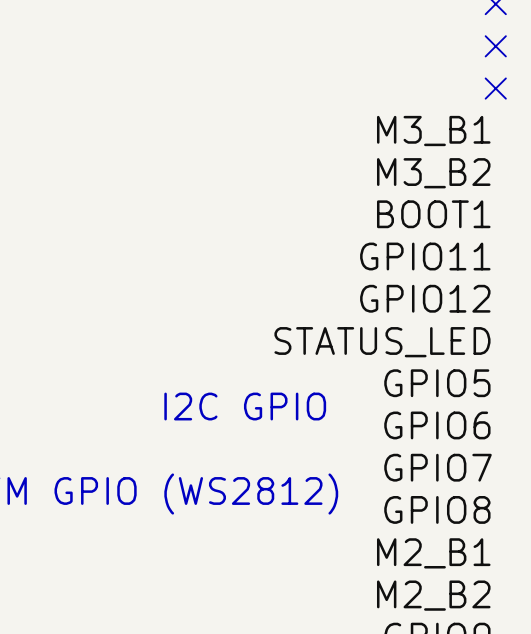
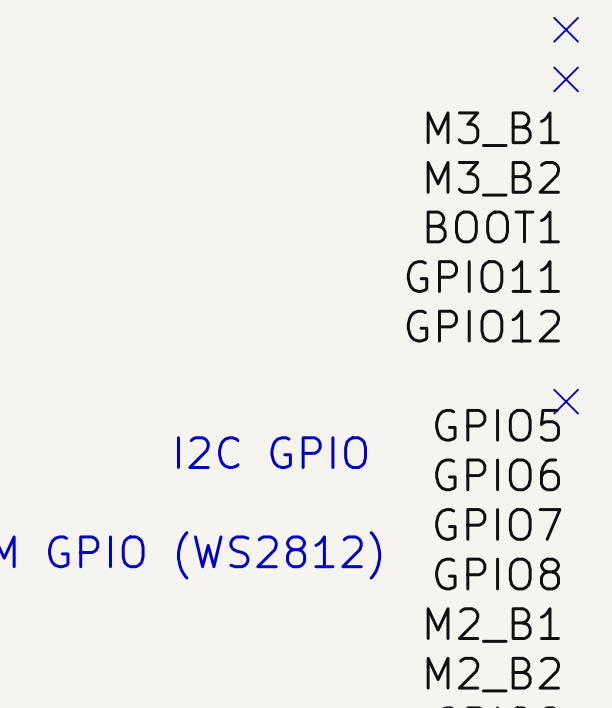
label: STATUS_LED (382, 342) -> none
no-connect mark: none -> (566, 401)

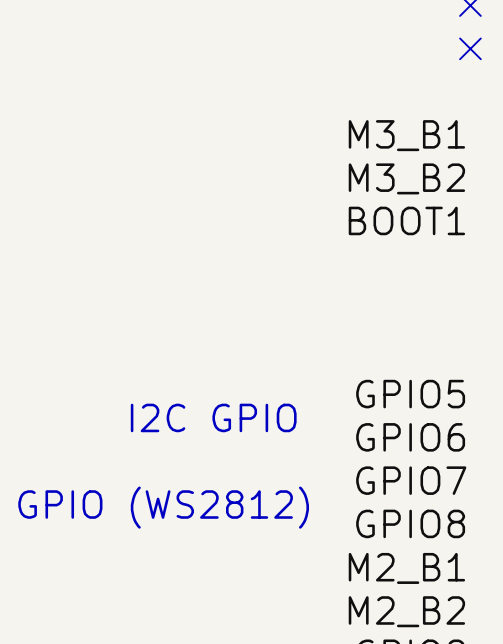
no-connect mark: (566, 79) -> none
label: GPIO11 (483, 276) -> none
label: GPIO12 (483, 326) -> none
no-connect mark: (566, 401) -> none

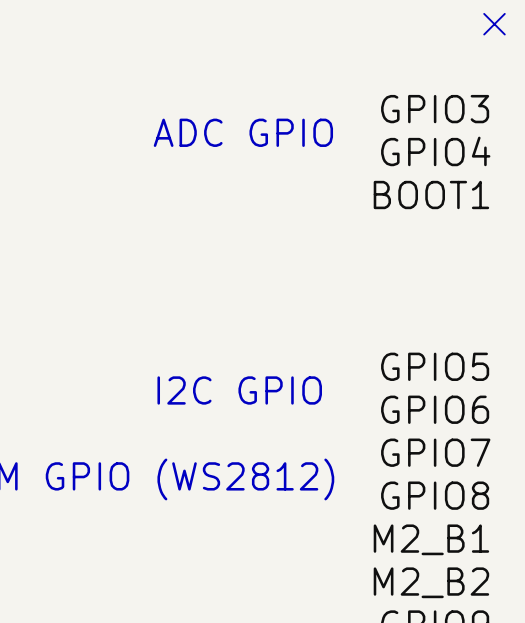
label: M3_B1 (406, 135) -> GPIO3 (435, 109)
text: none -> ADC GPIO (243, 132)
label: M3_B2 (406, 178) -> GPIO4 (435, 151)

